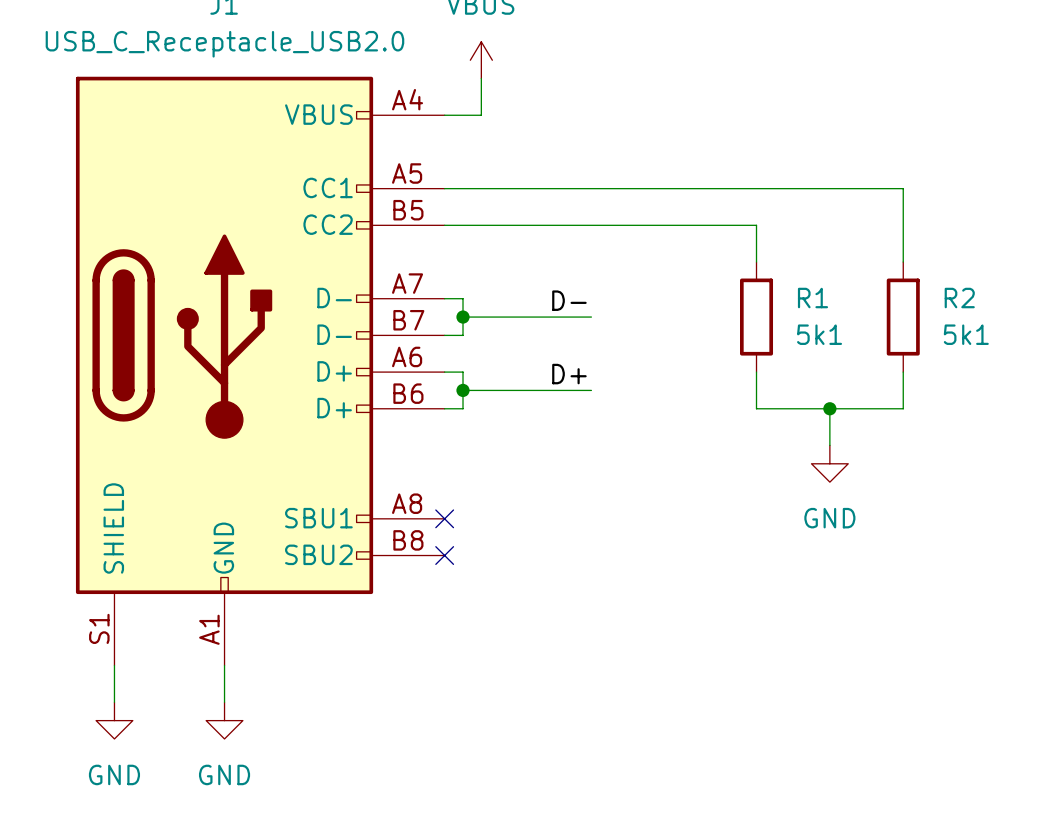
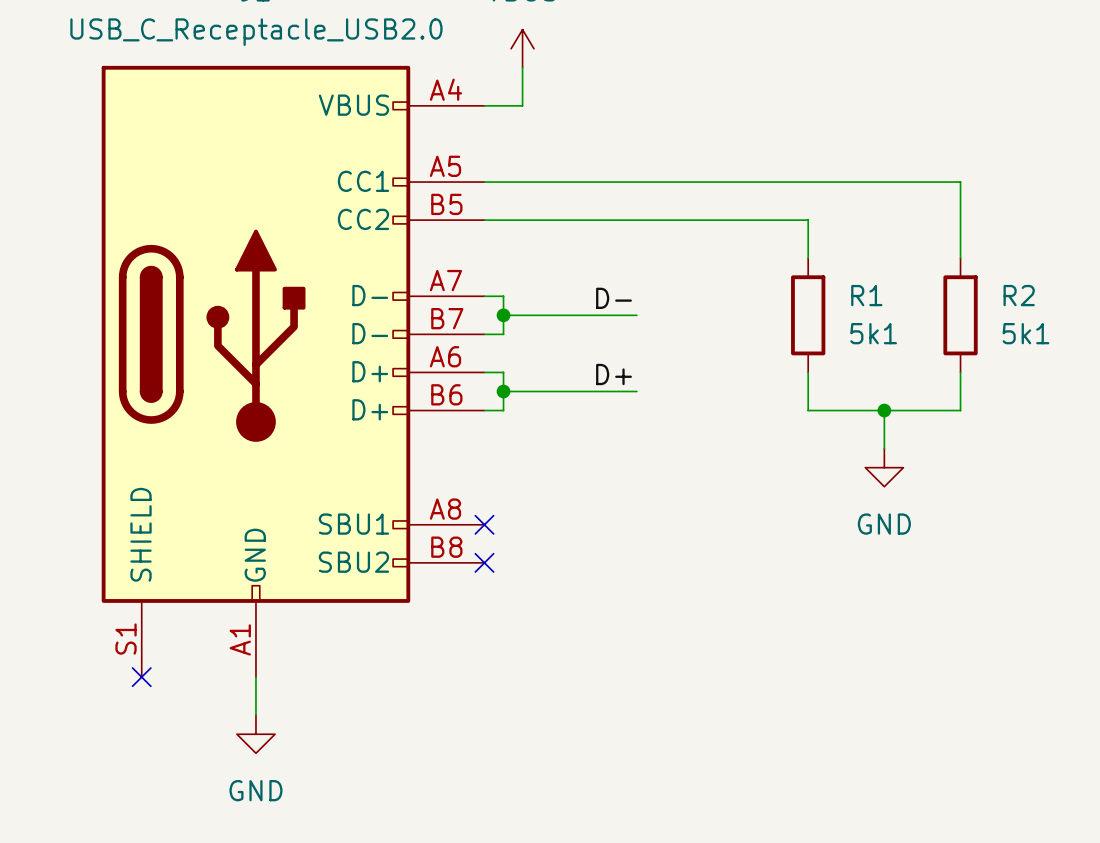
wire: (114, 665) (114, 702) -> none
no-connect mark: none -> (141, 677)
power symbol: GND (114, 720) -> none

